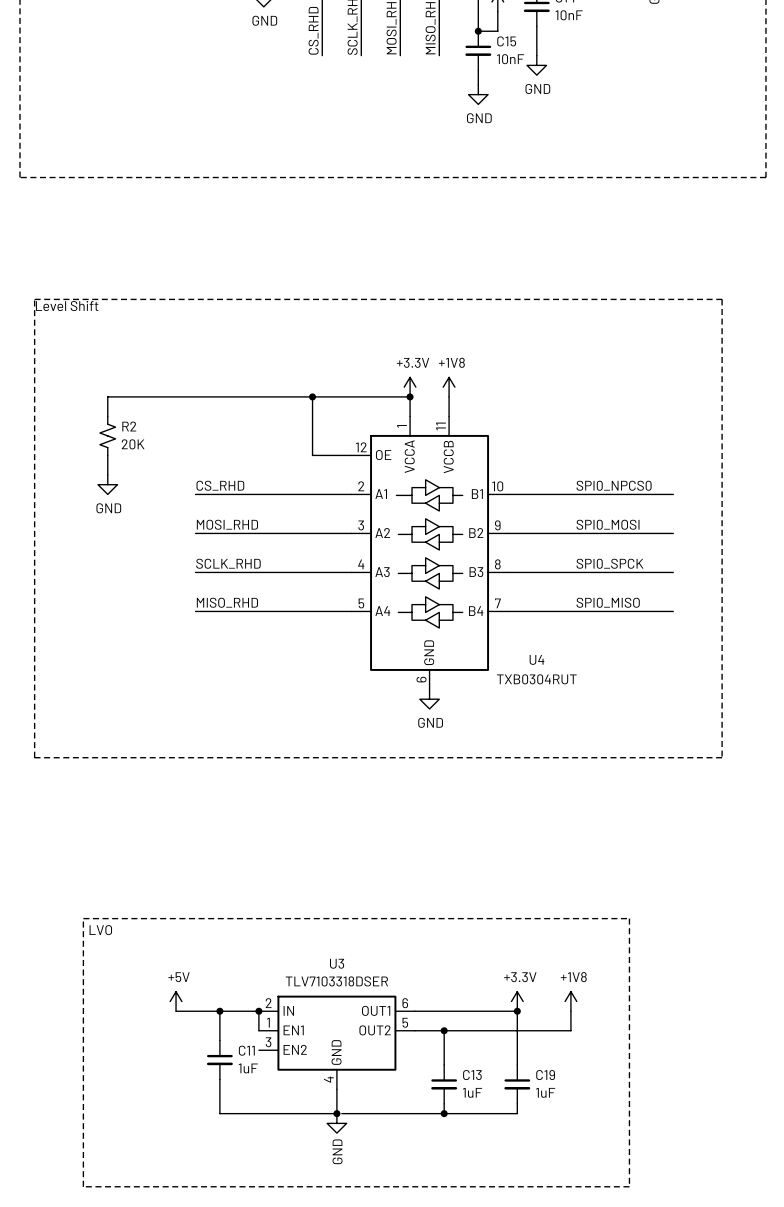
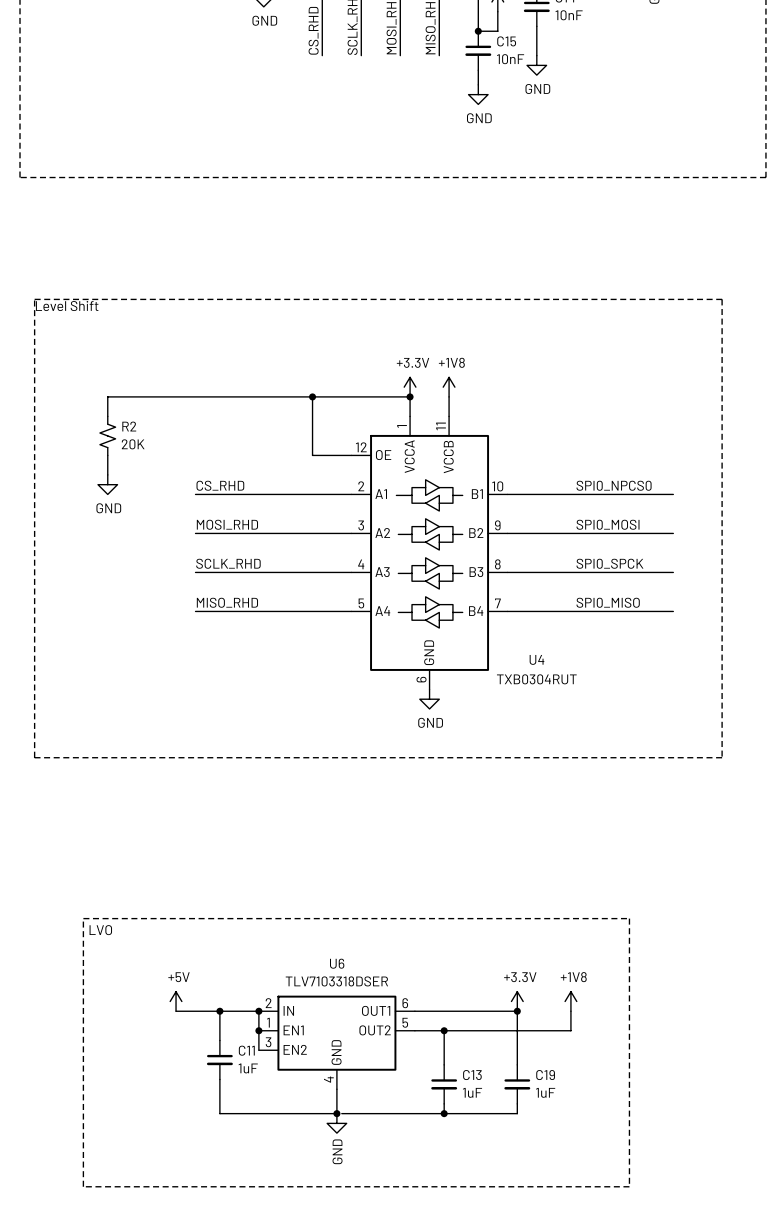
U3 name: U3 (337, 963) -> U6 (337, 963)
wire: none -> (258, 1030) (258, 1050)
junction: none -> (258, 1030)

